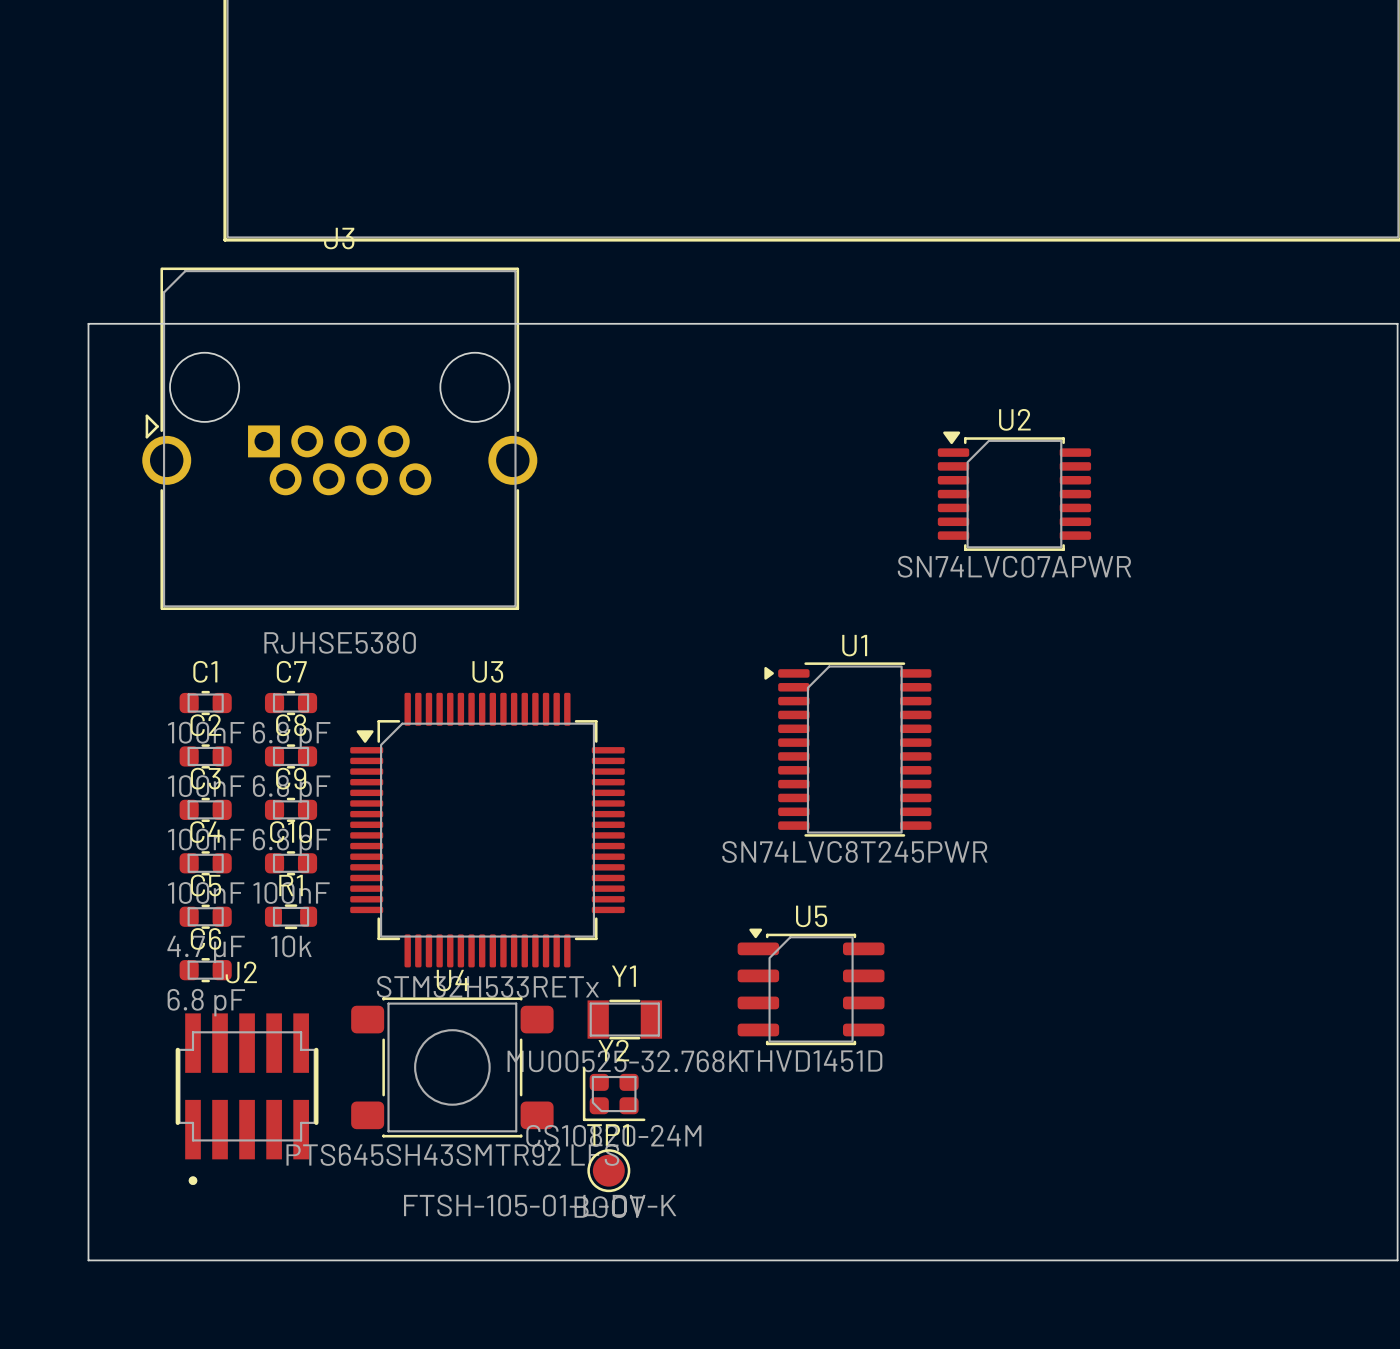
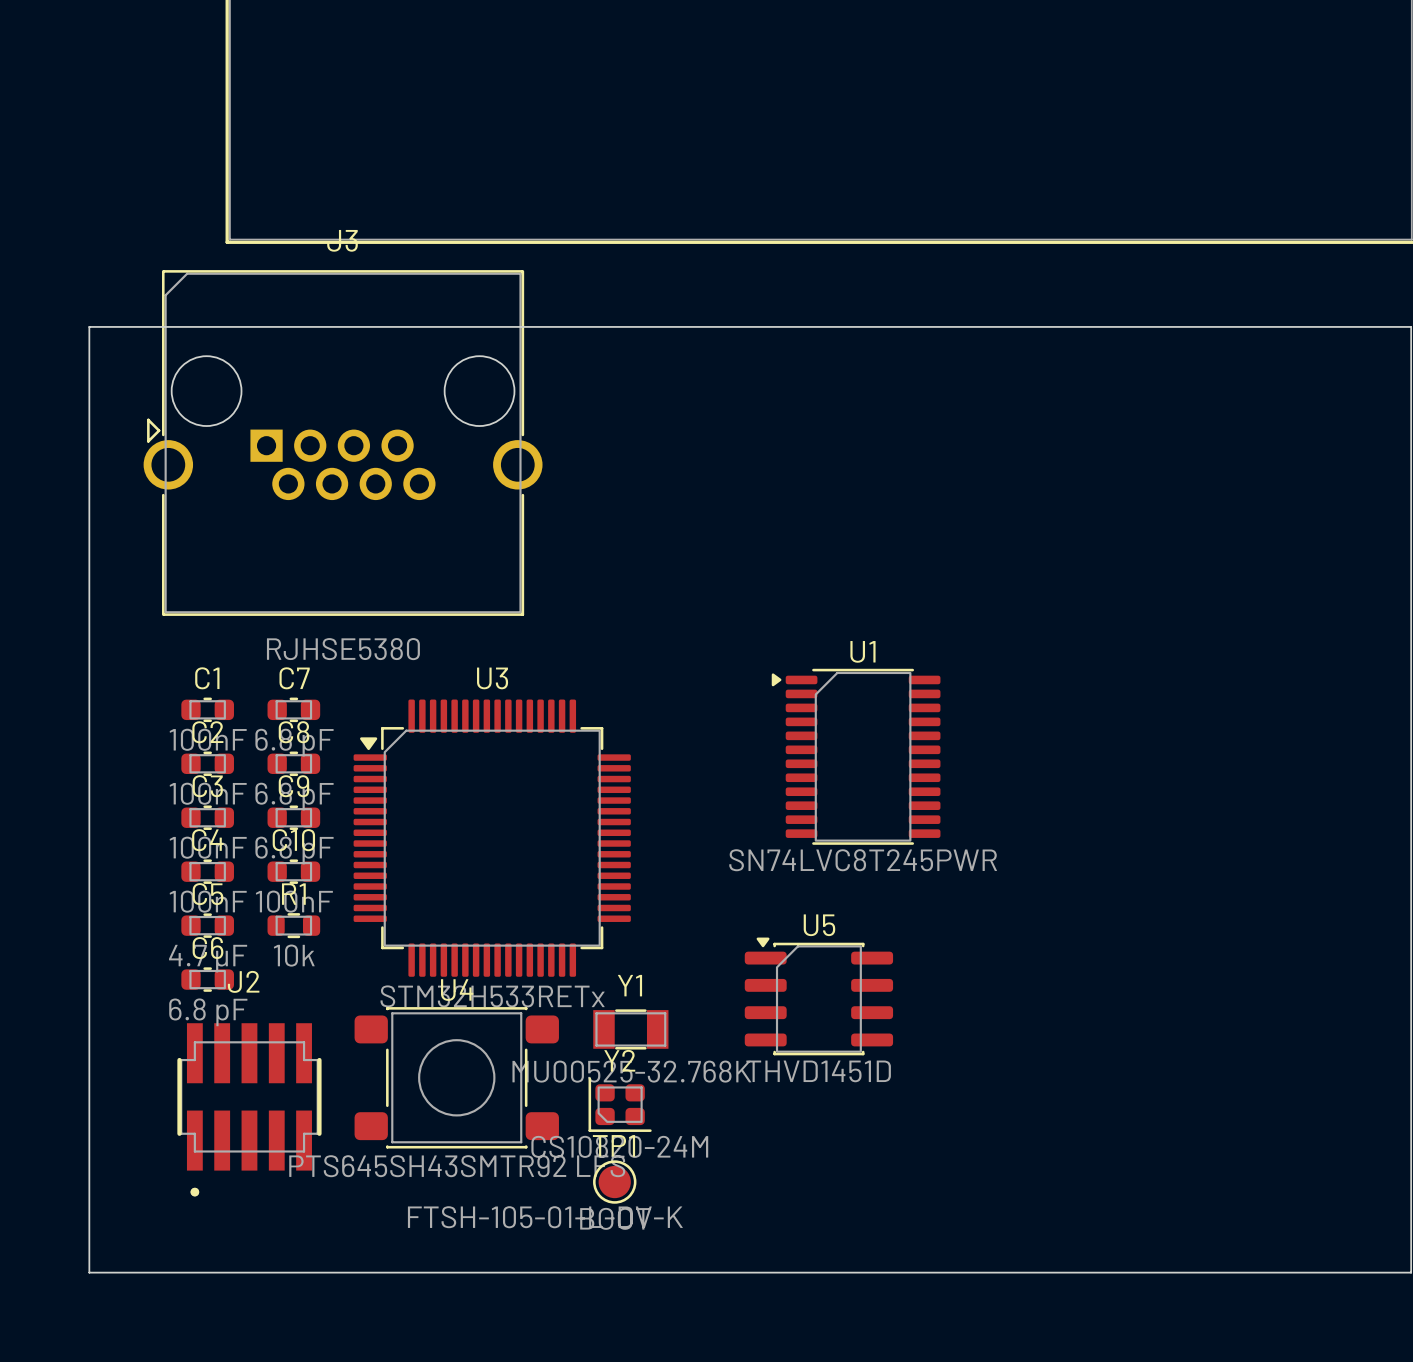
U2: SN74LVC07APWR (1014, 491) -> none

